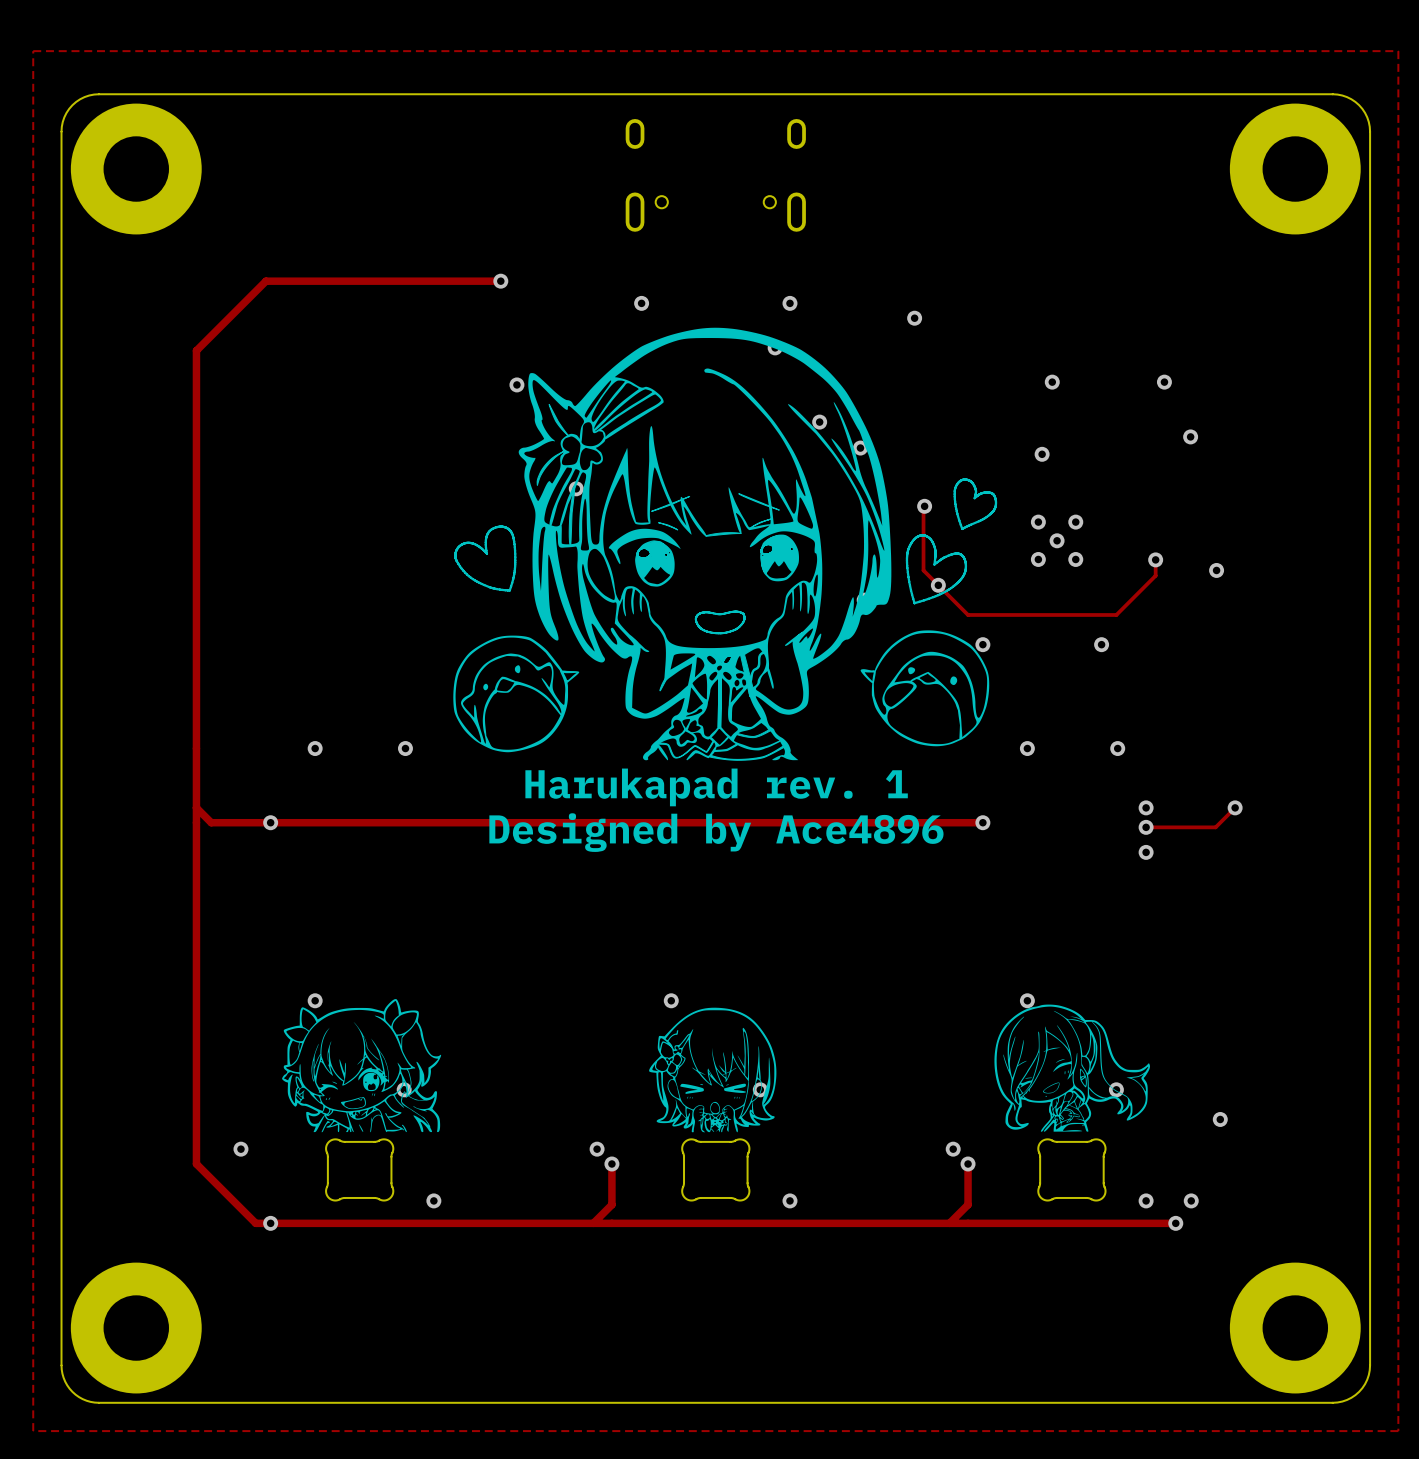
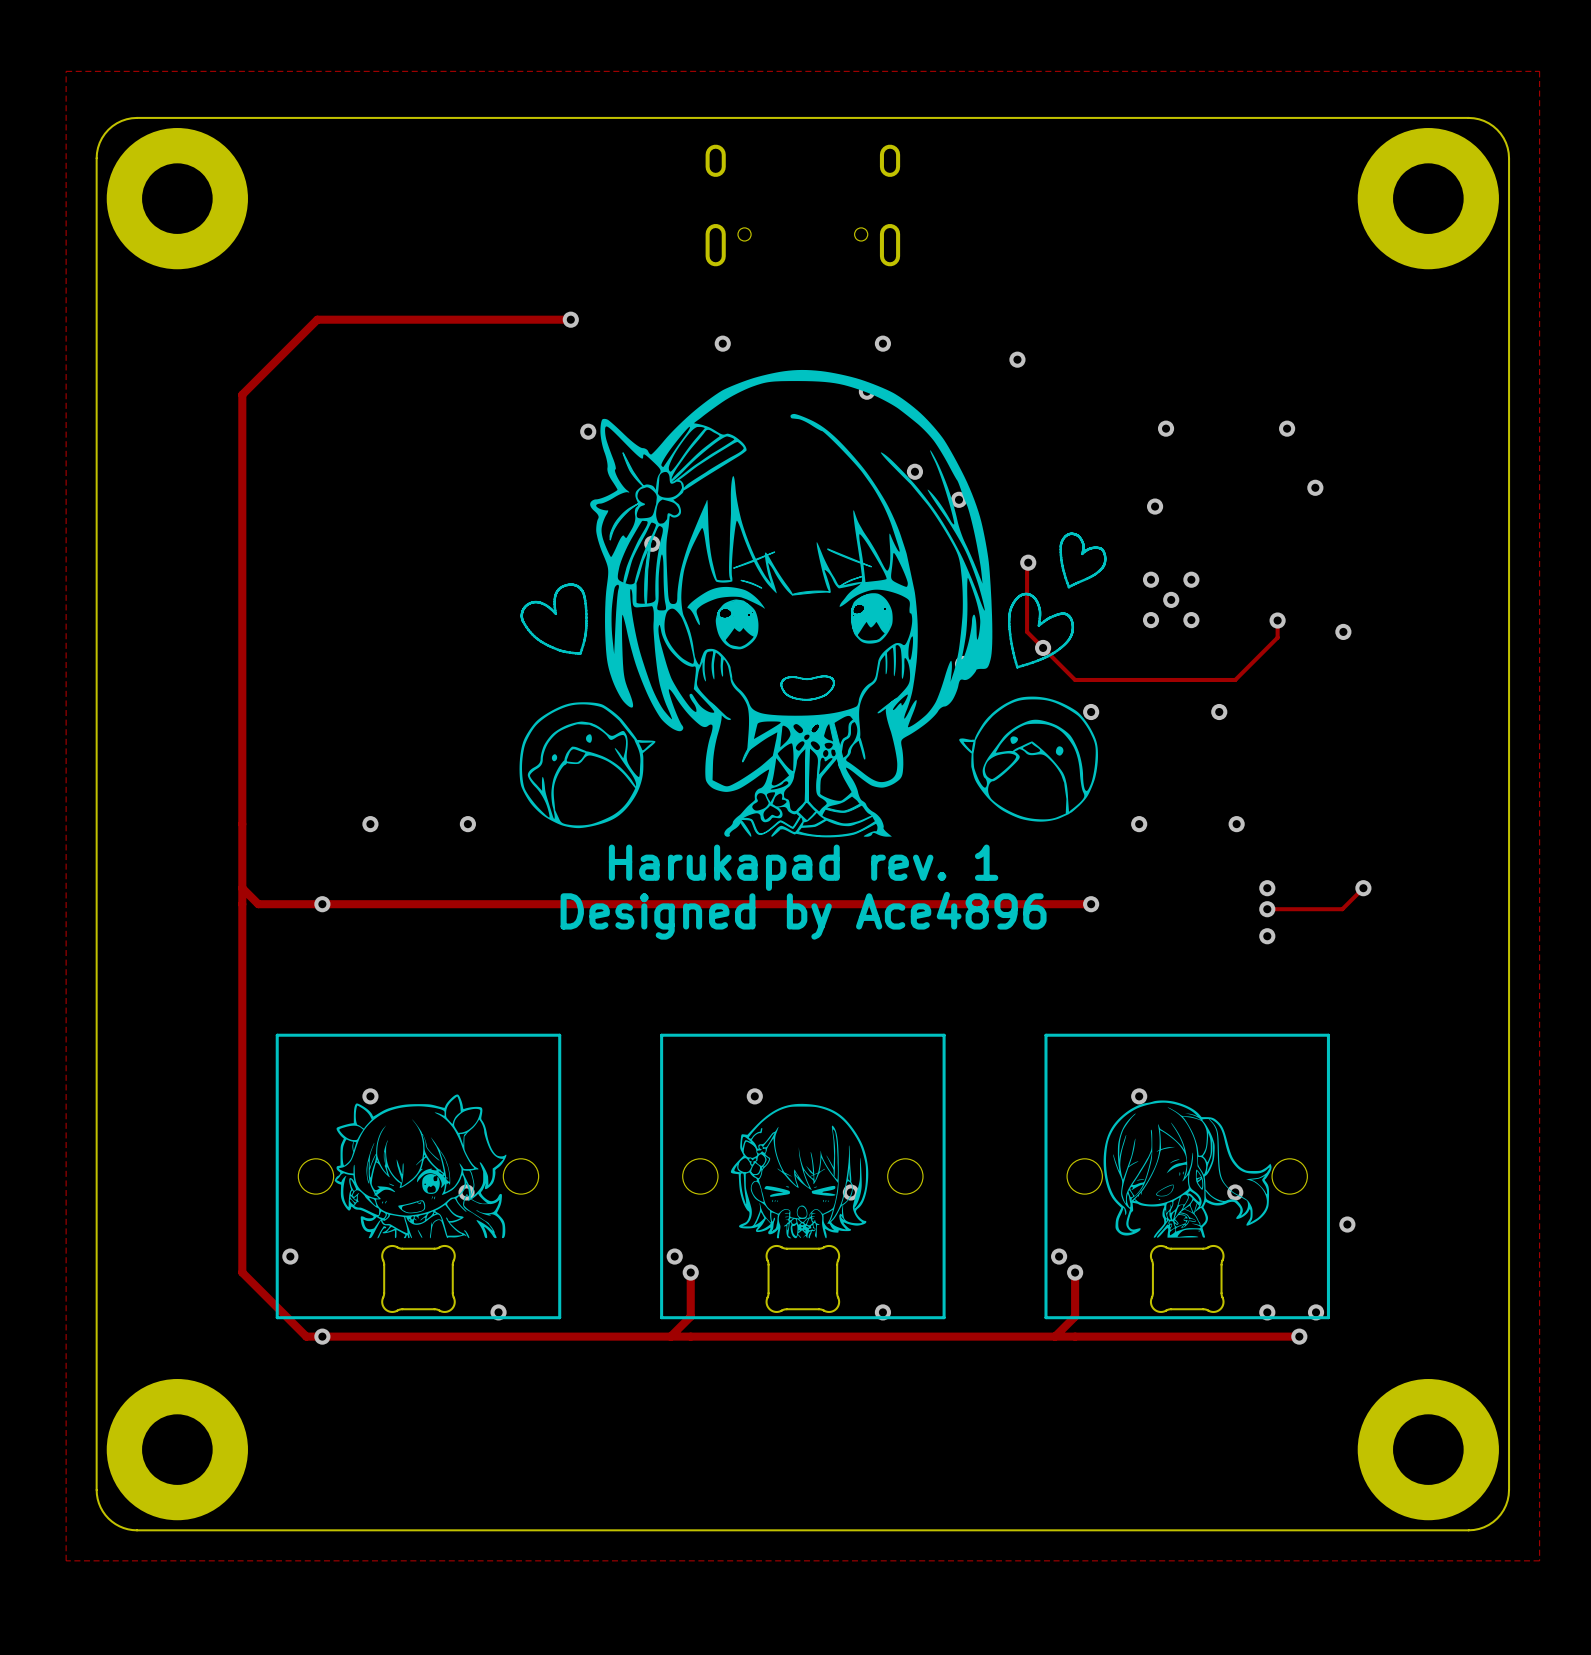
part: none -> (418, 1176)
part: none -> (802, 1176)
part: none -> (1187, 1176)

